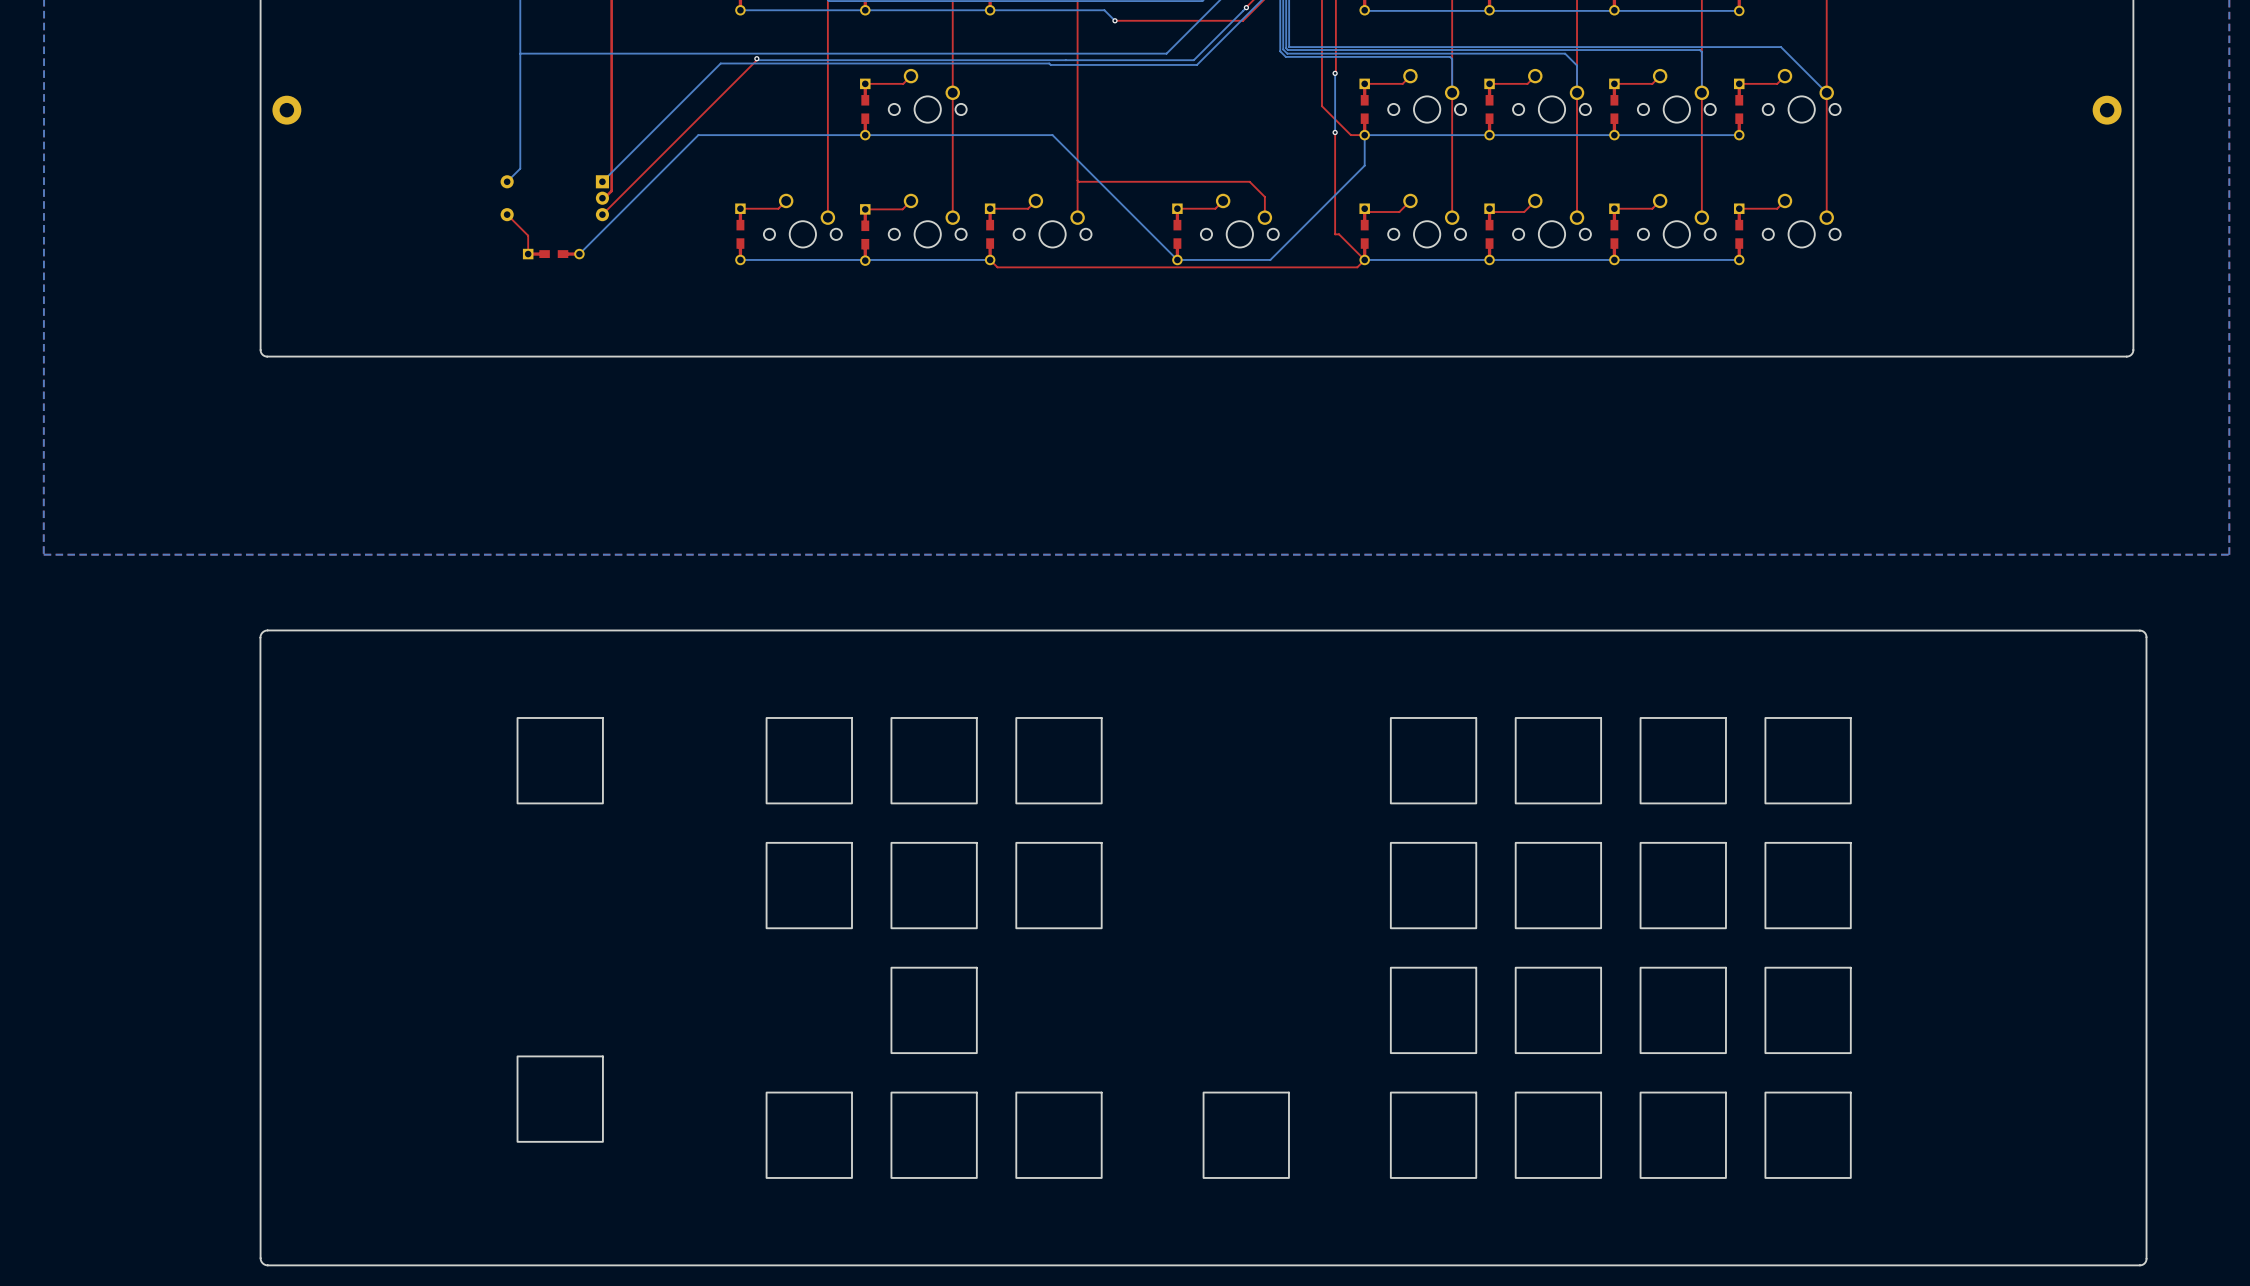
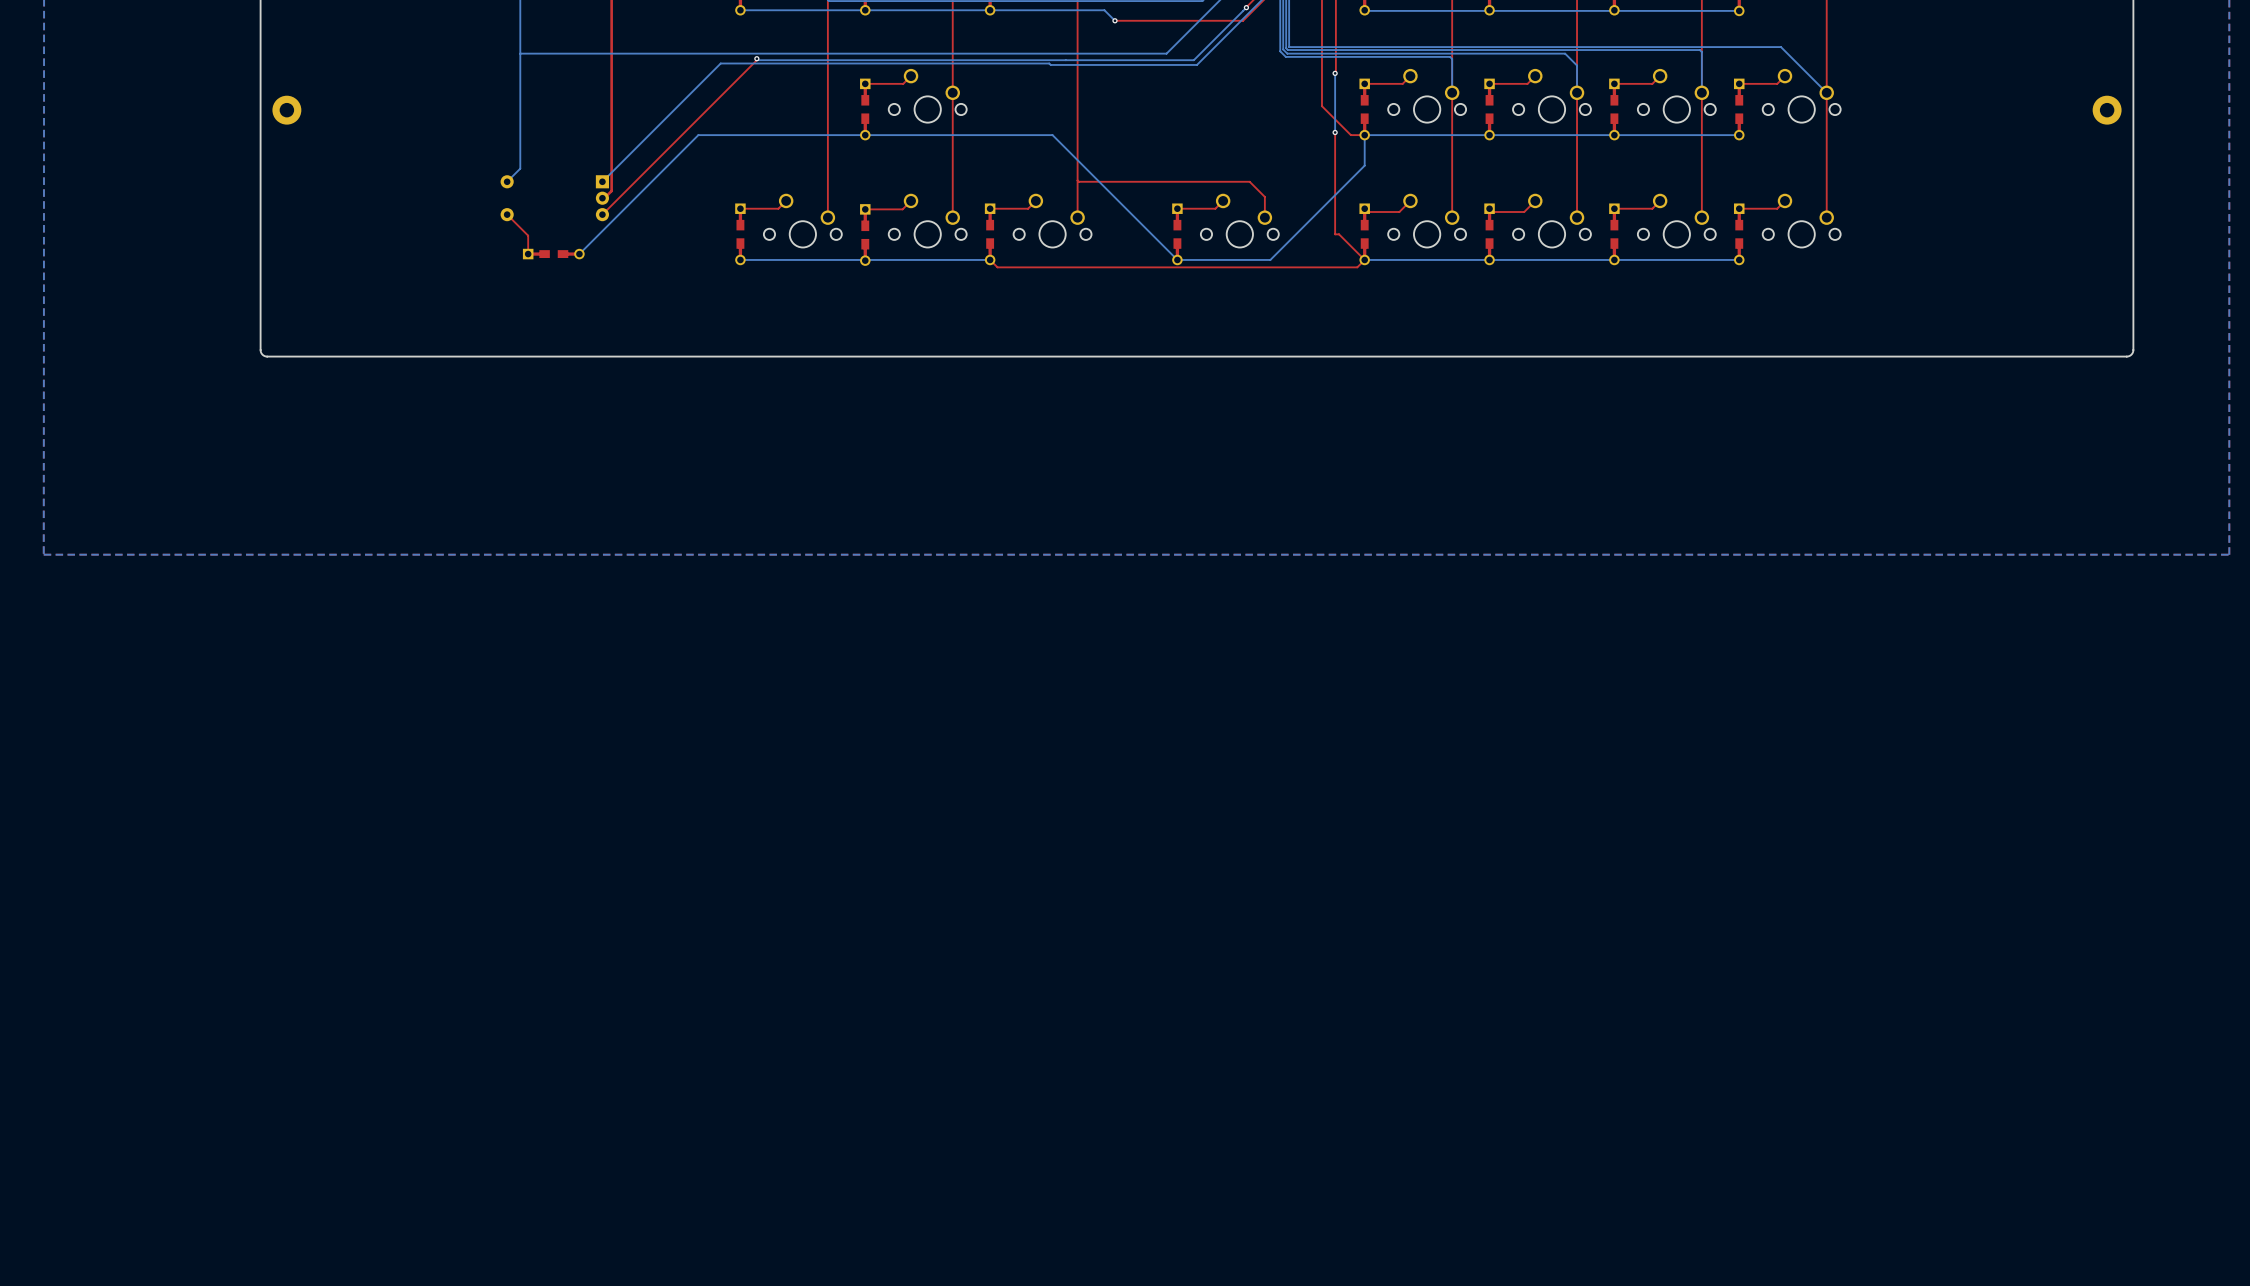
drawing: [260, 630, 2147, 1266] -> none

